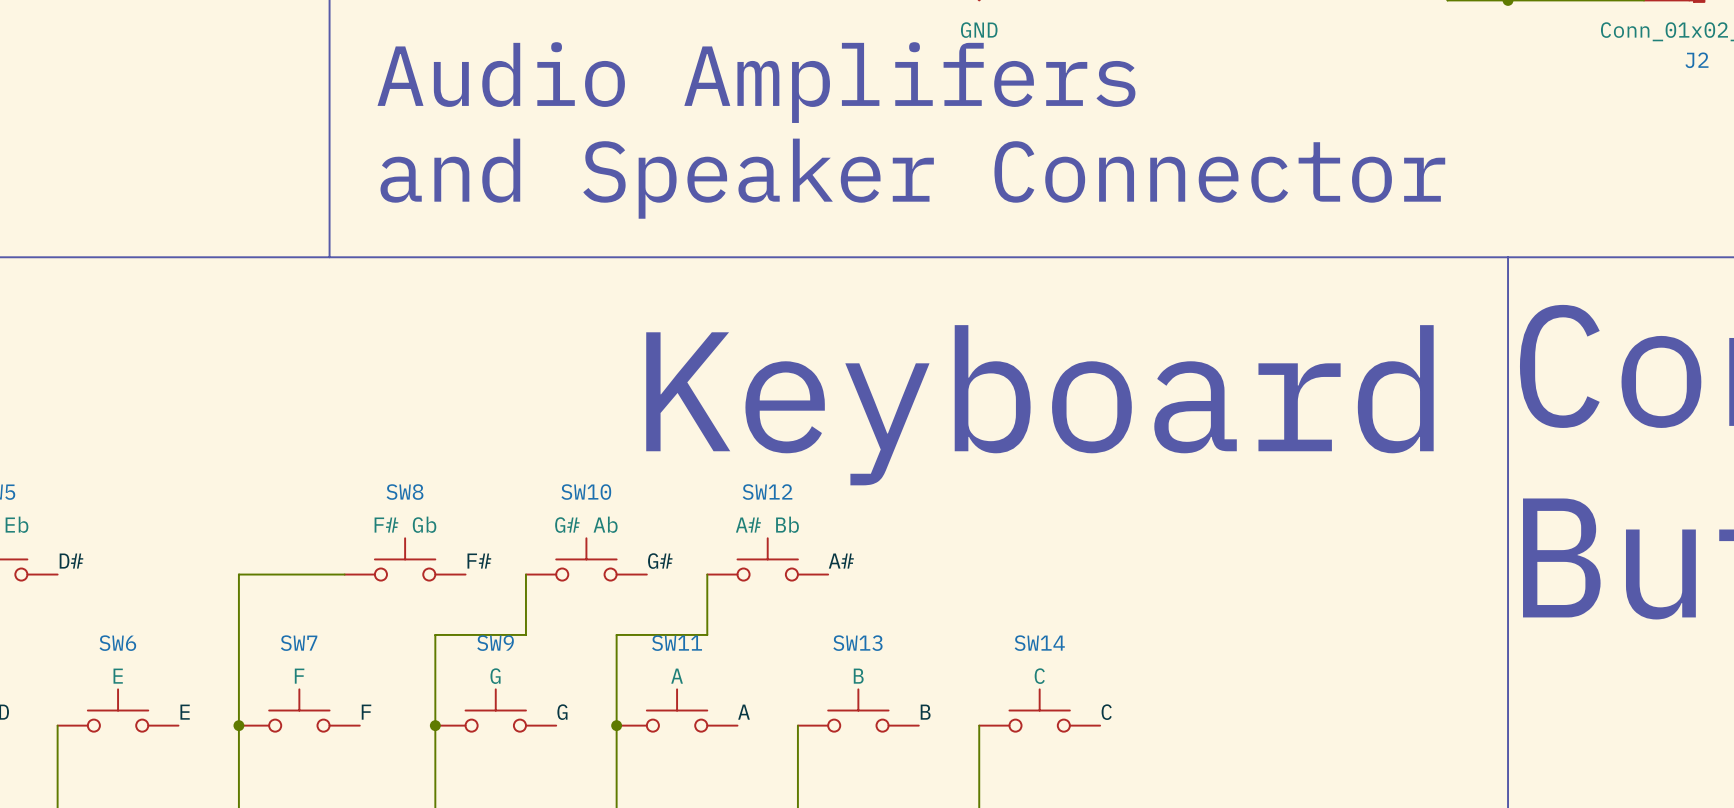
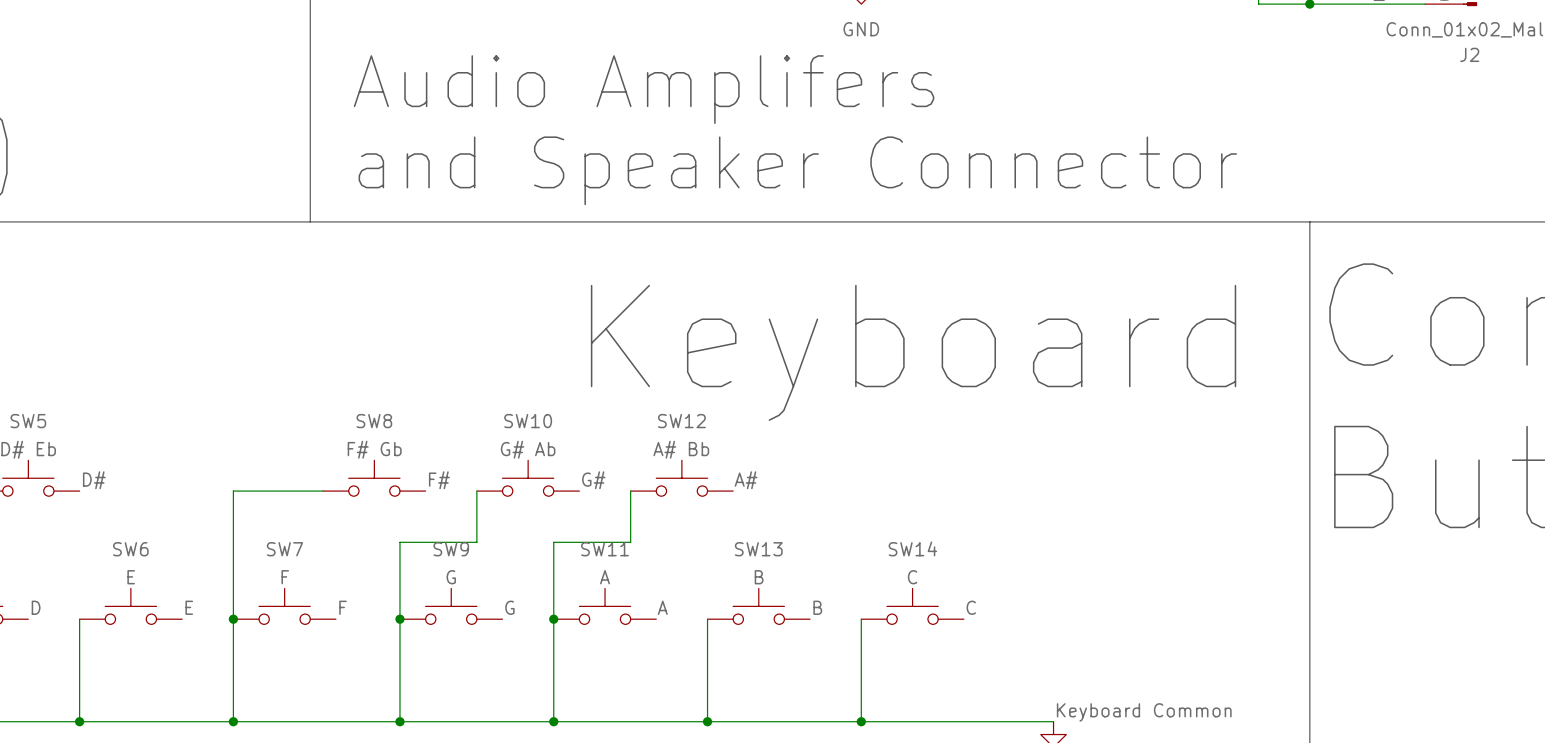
text position: Audio Amplifers (756, 82) -> Audio Amplifers (644, 89)
text position: and Speaker Connector (912, 178) -> and Speaker Connector (797, 170)

